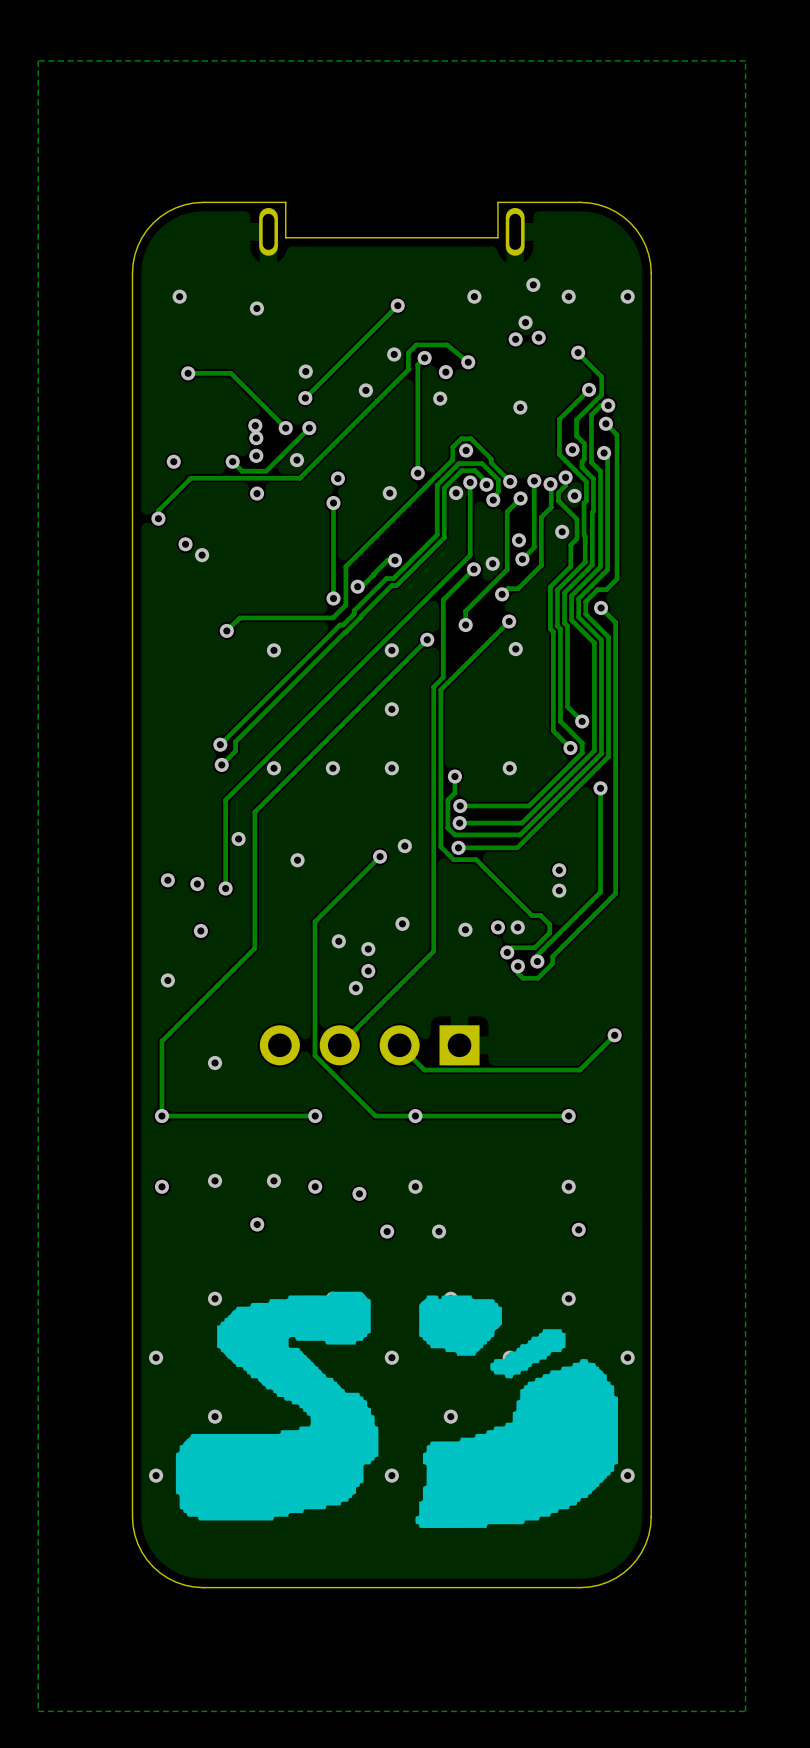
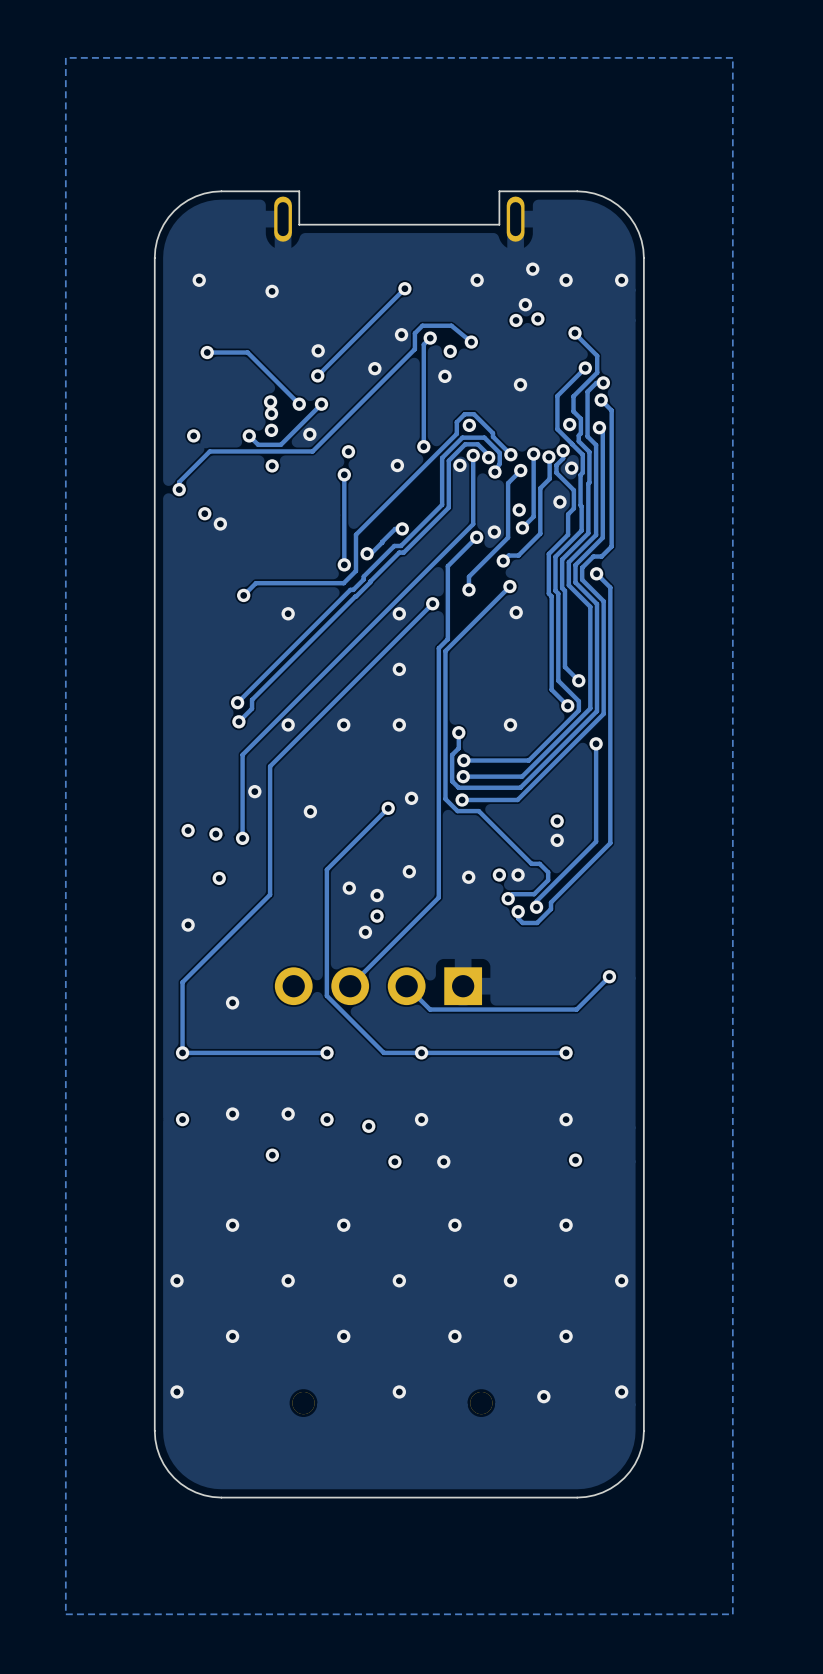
drawing: [175, 1291, 379, 1521] -> none
drawing: [415, 1295, 619, 1529] -> none

